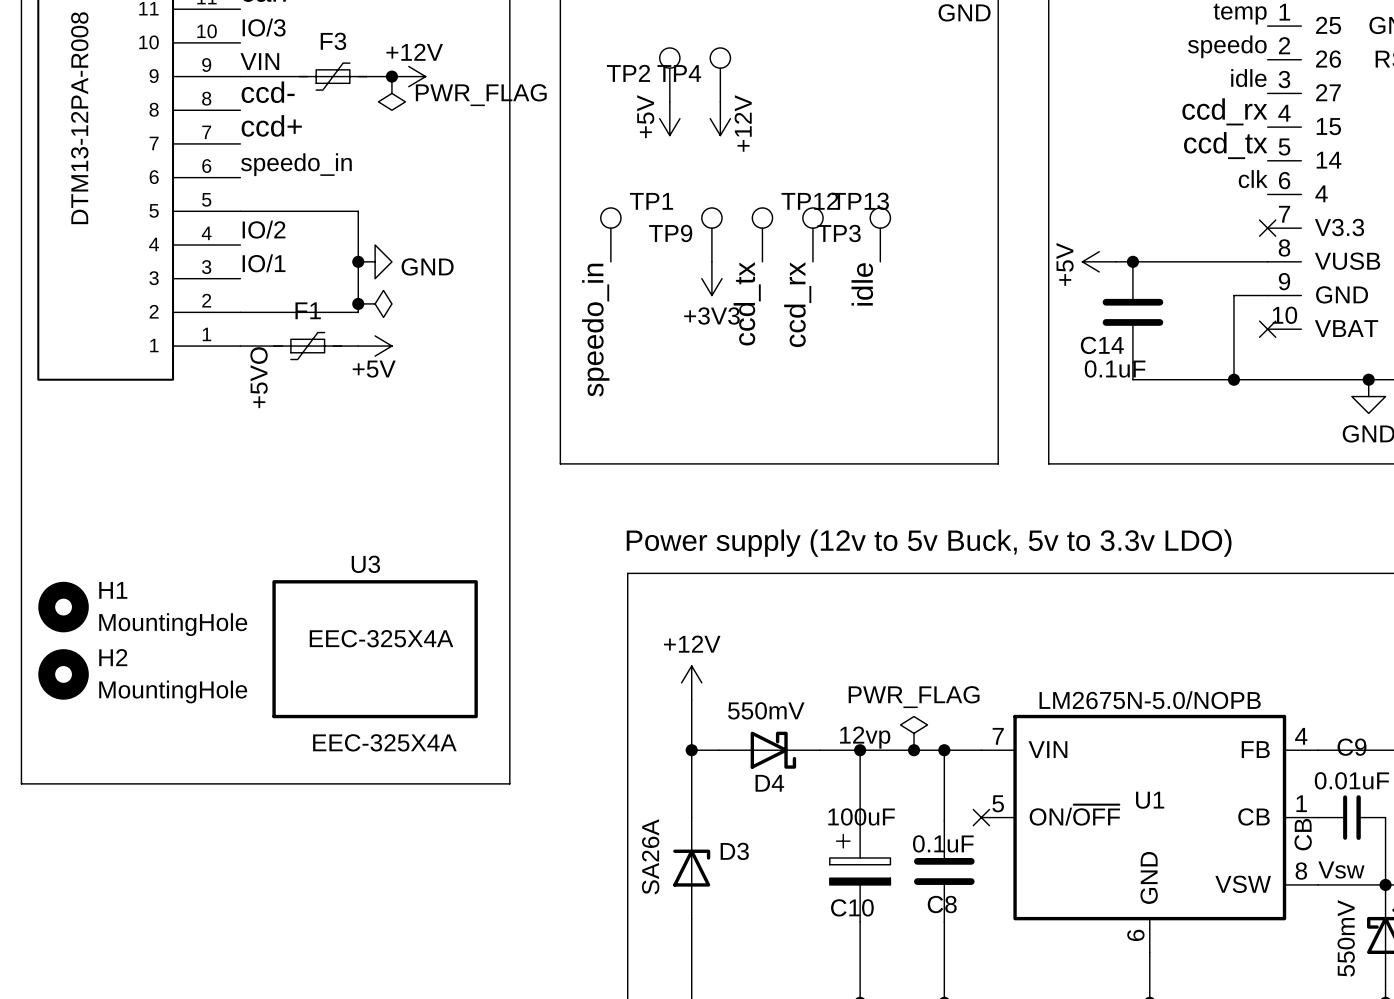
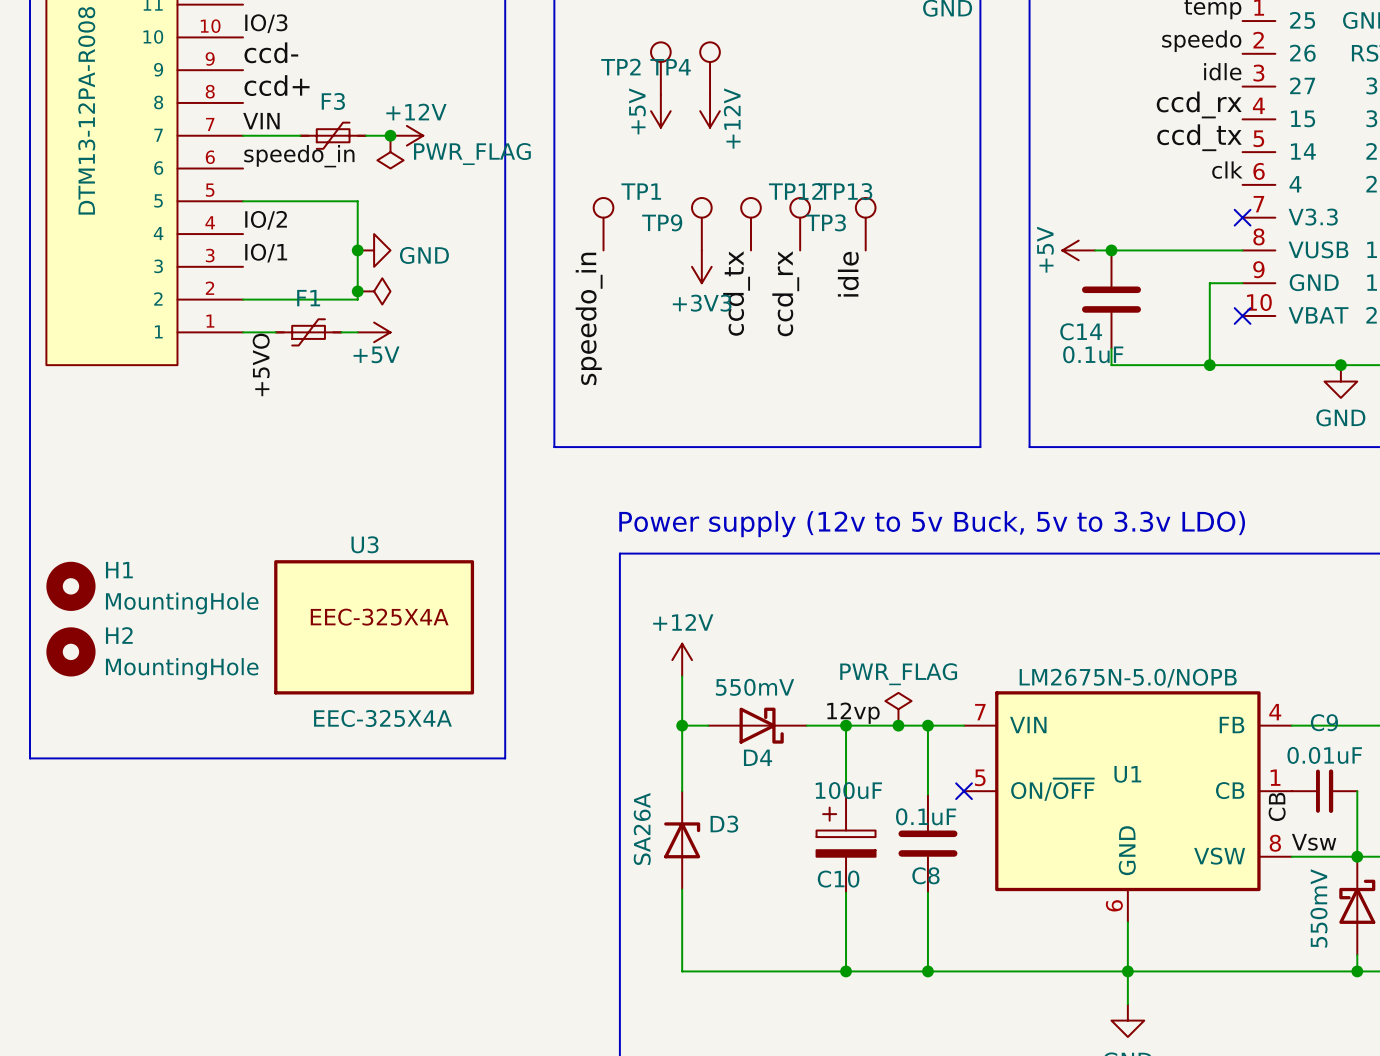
label: VIN (259, 61) -> ccd- (271, 52)
wire: (240, 76) (299, 76) -> (243, 135) (300, 135)
F3 position: (333, 76) -> (333, 135)
wire: (366, 76) (391, 76) -> (365, 135) (390, 135)
junction position: (391, 76) -> (390, 135)
power symbol position: +12V (408, 76) -> +12V (406, 135)
label: ccd- (268, 92) -> ccd+ (277, 85)
power symbol position: PWR_FLAG (391, 93) -> PWR_FLAG (390, 152)
label: ccd+ (271, 125) -> VIN (261, 121)

